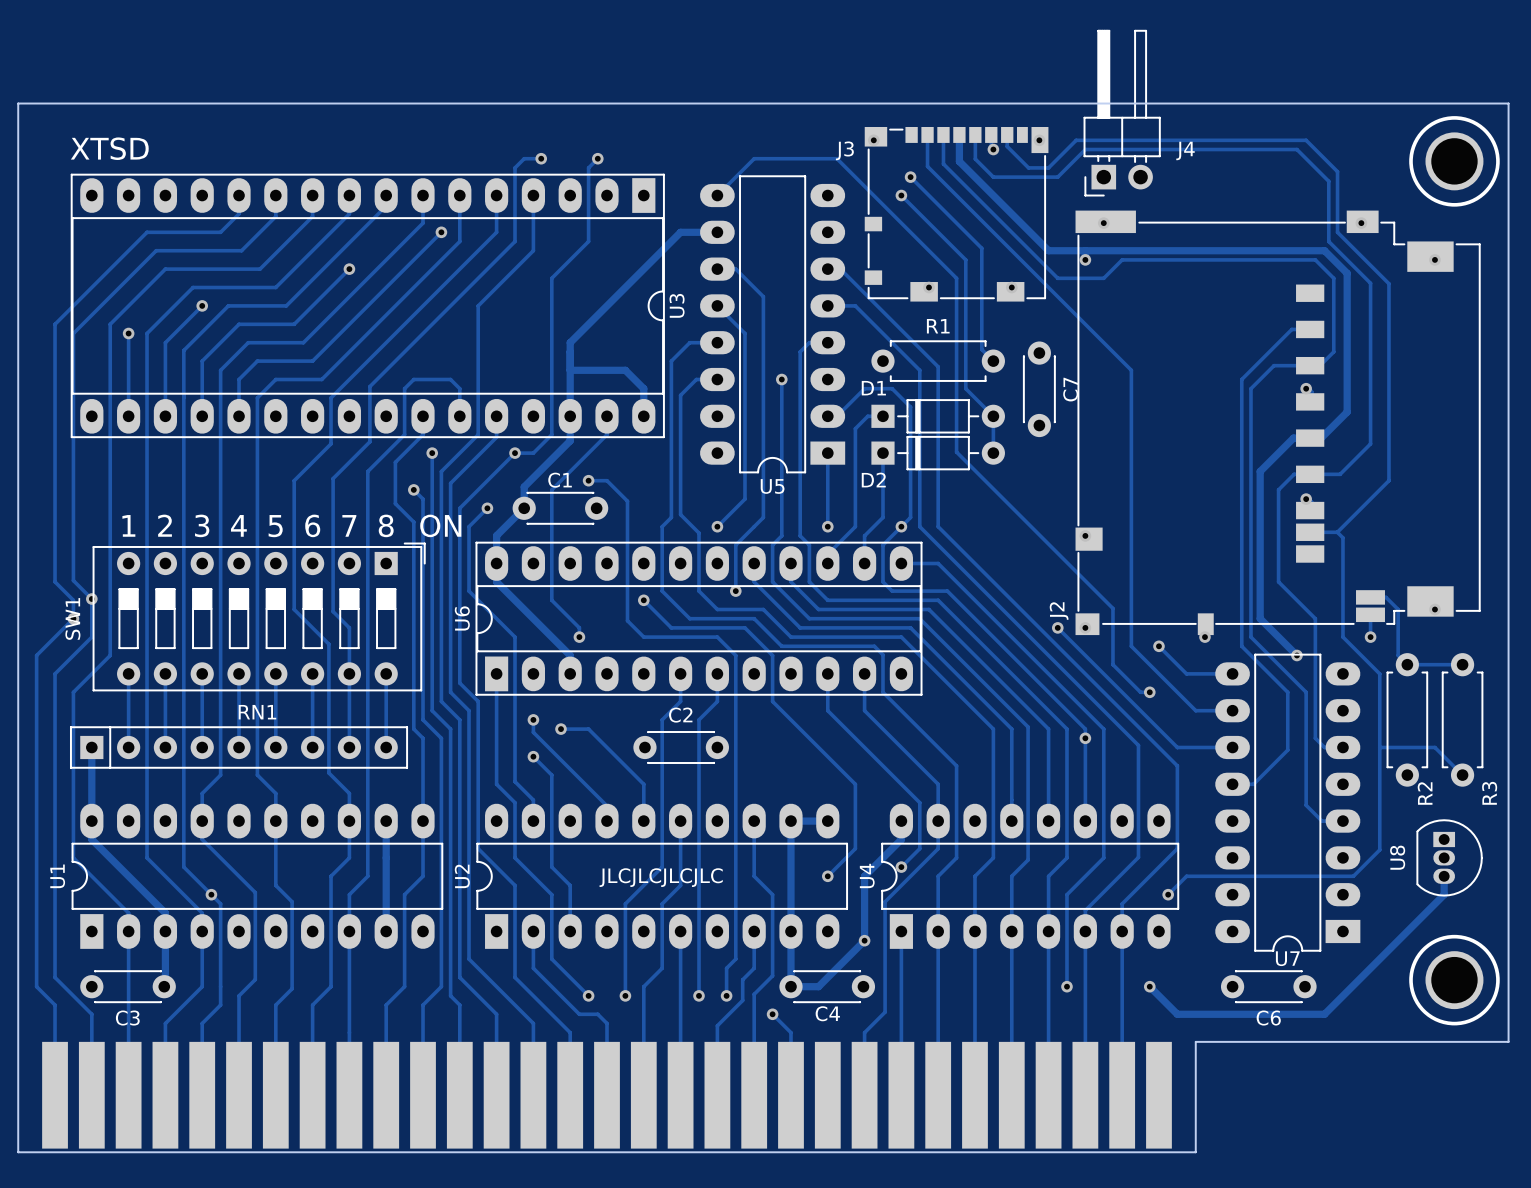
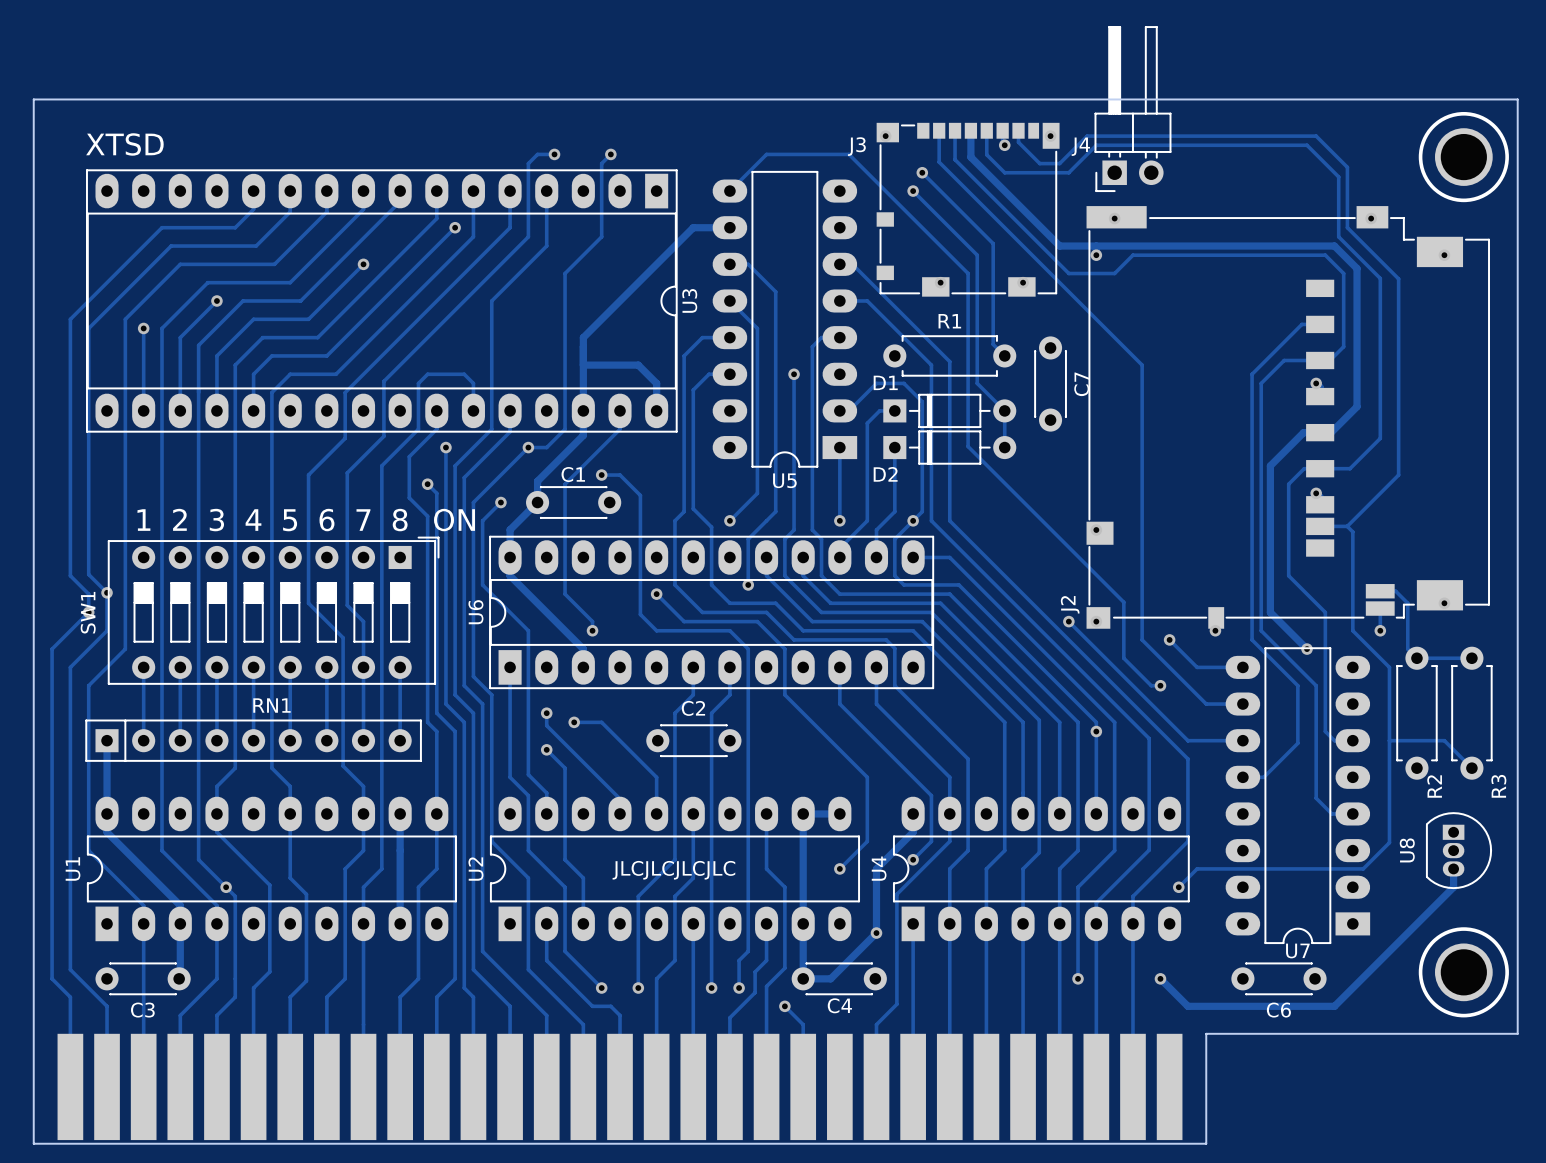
J4 name position: J4 (1185, 150) -> J4 (1080, 146)

